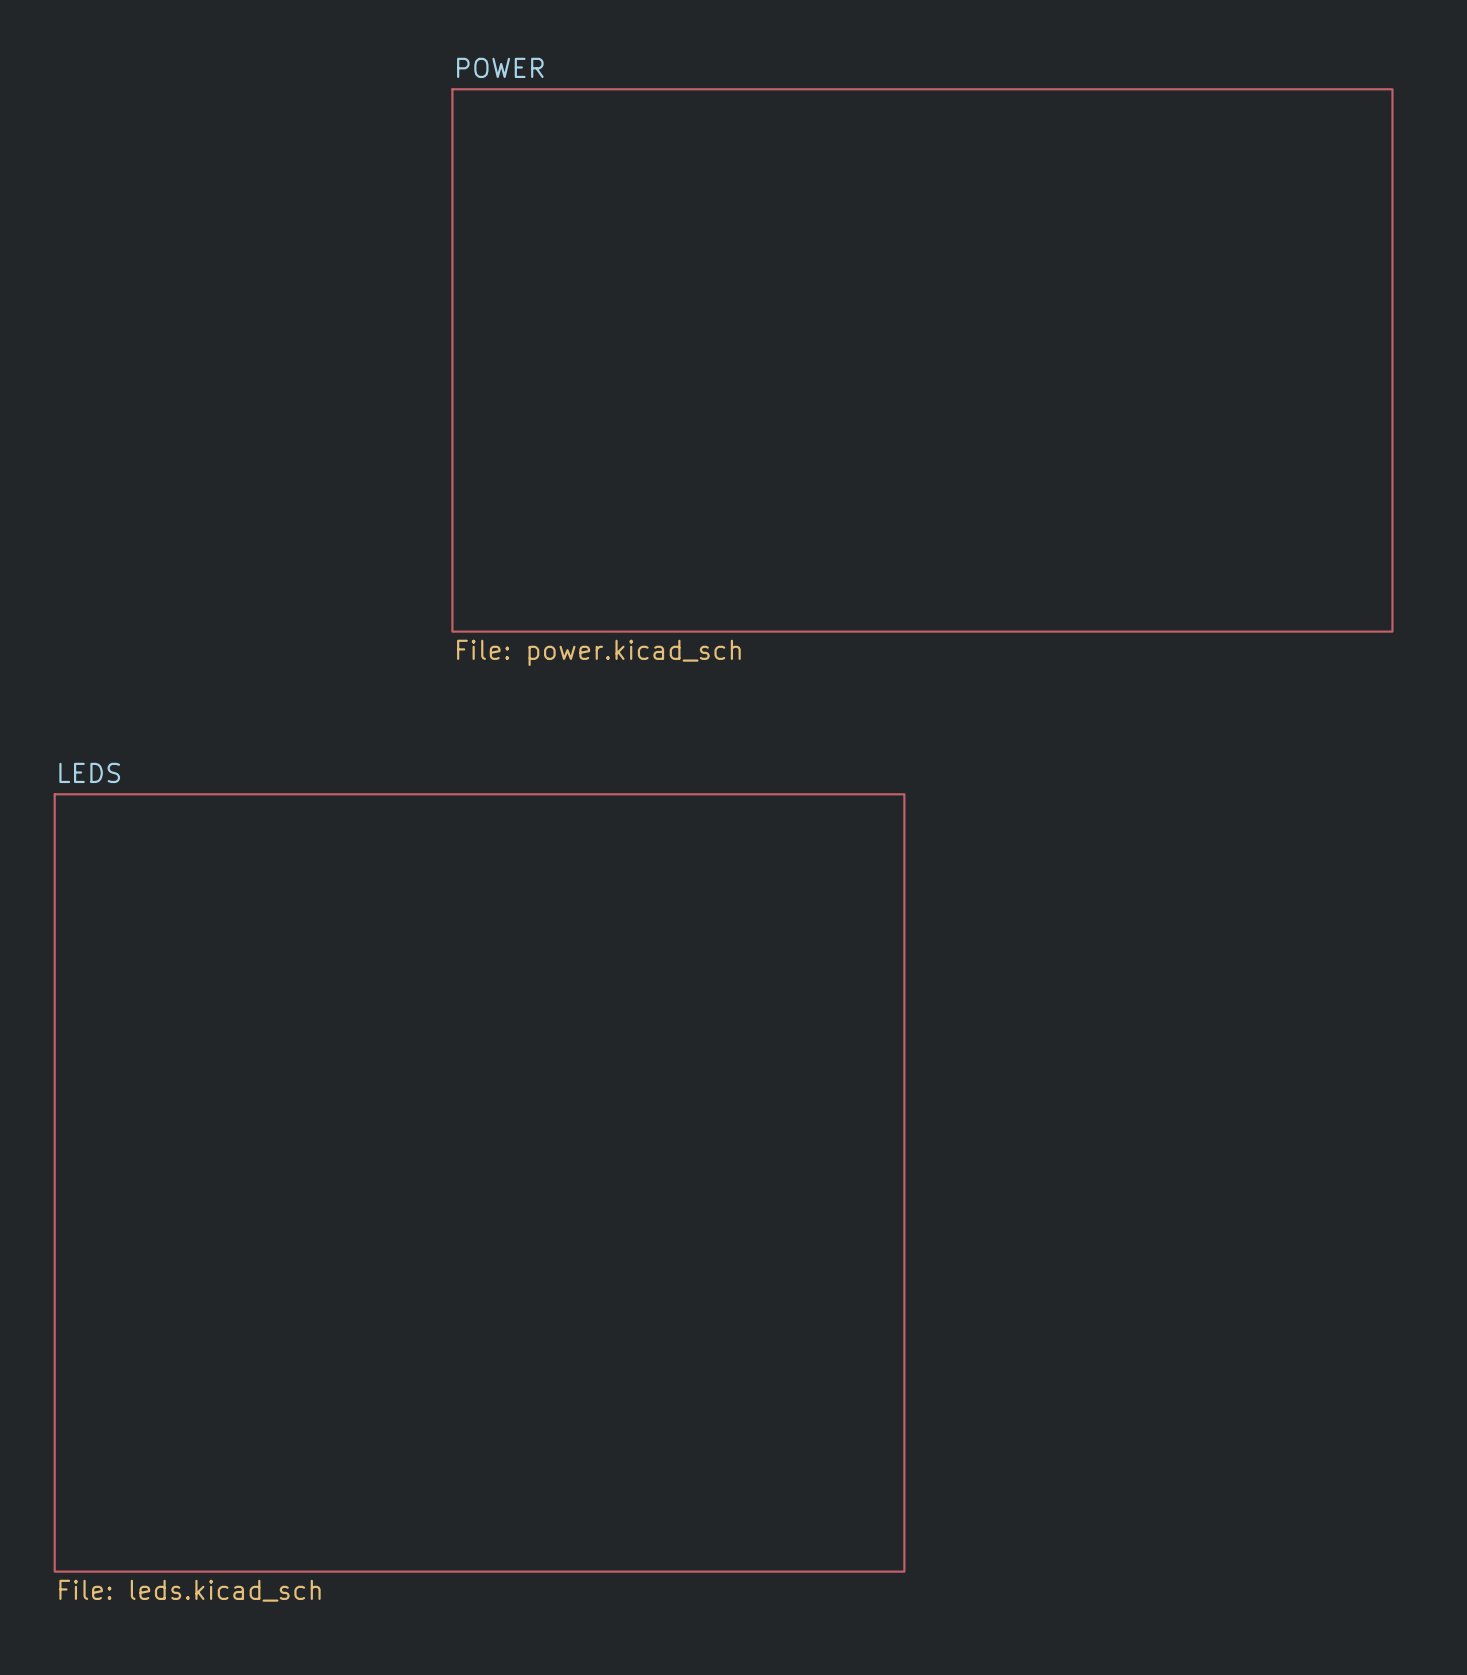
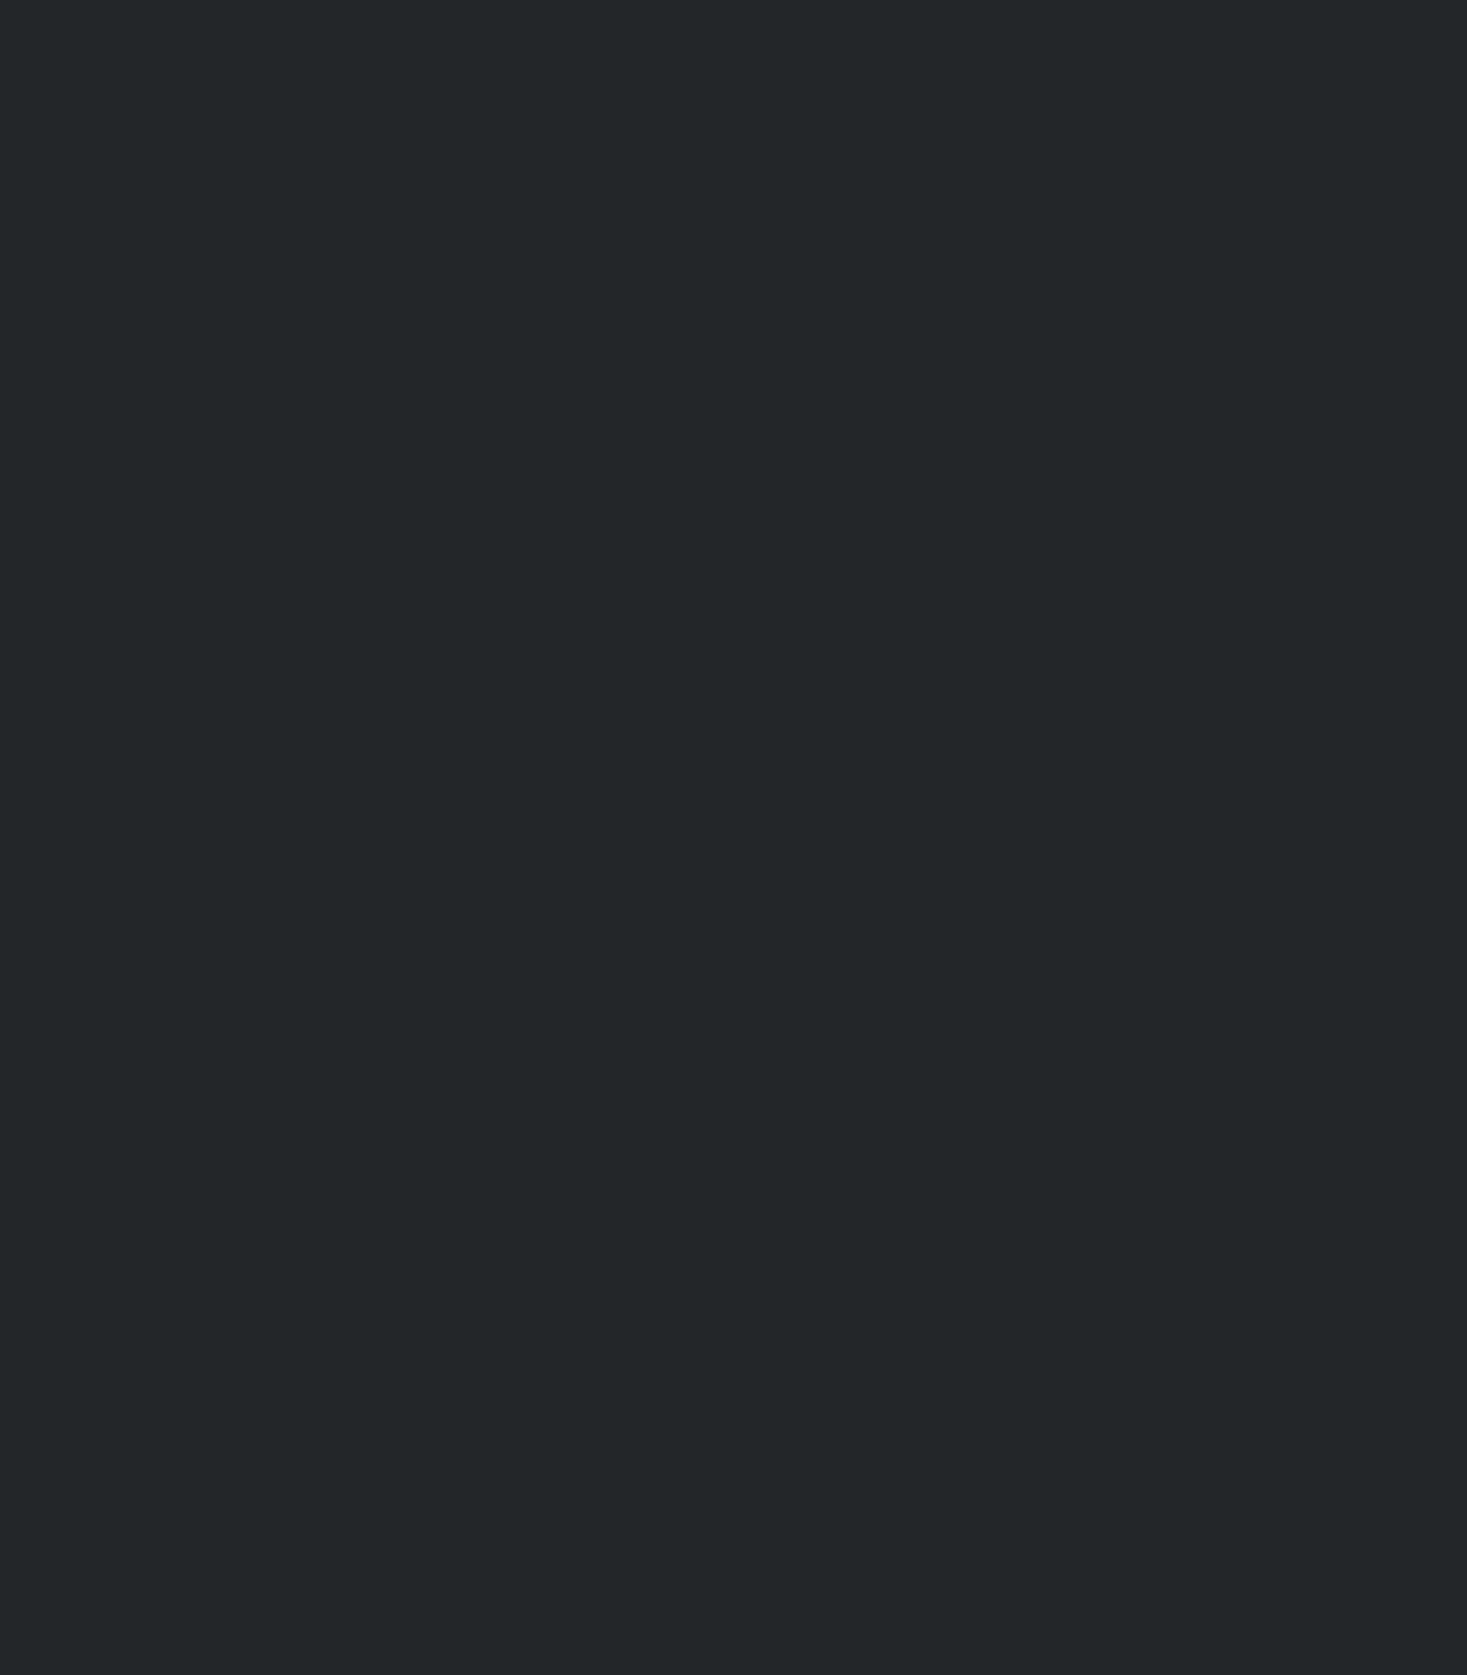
sheet POWER: File: power.kicad_sch (922, 360) -> none
sheet LEDS: File: leds.kicad_sch (479, 1182) -> none

